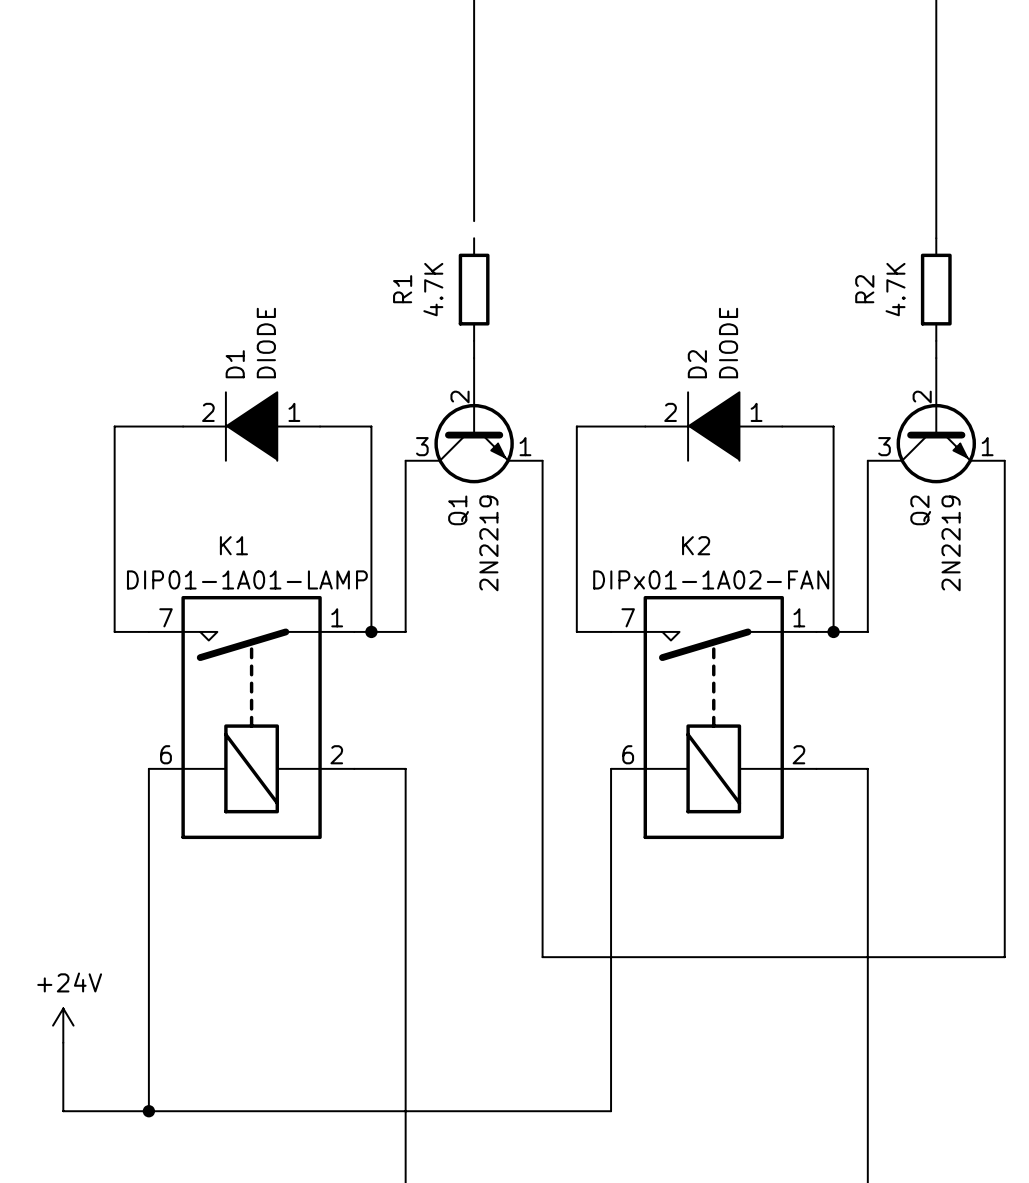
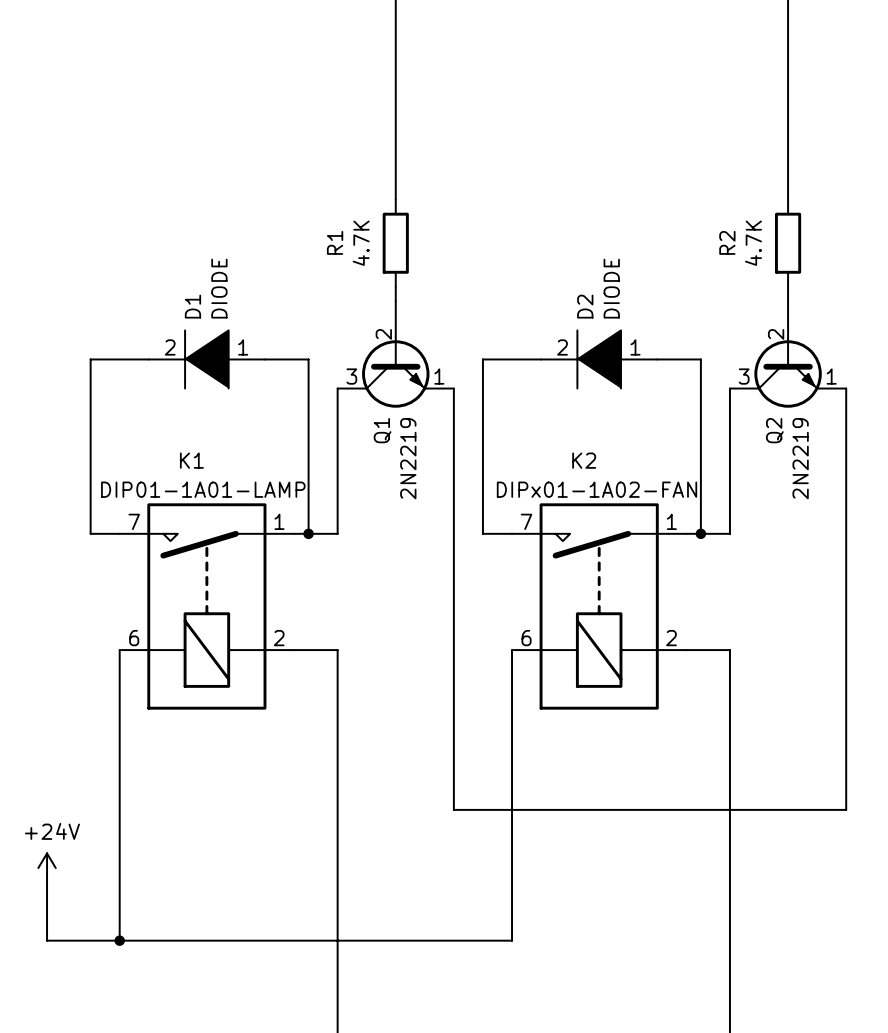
wire: none -> (395, 185) (395, 199)

